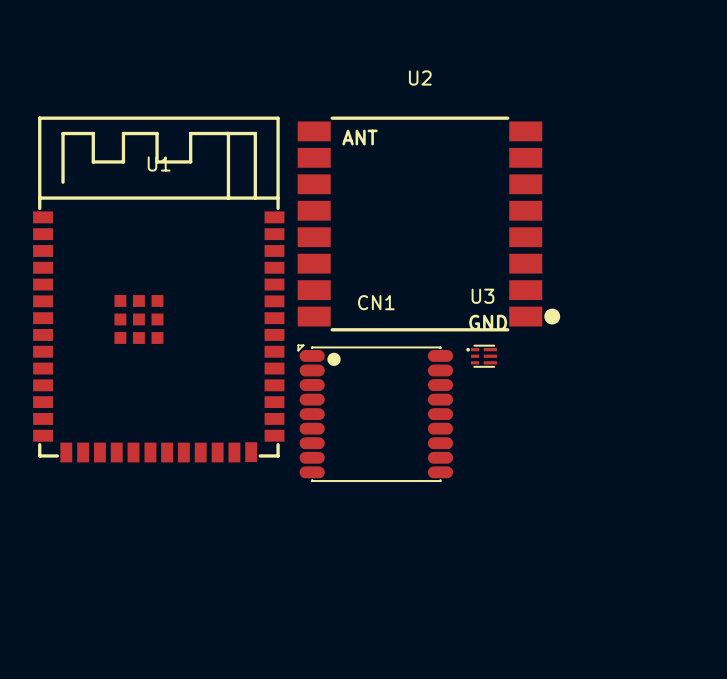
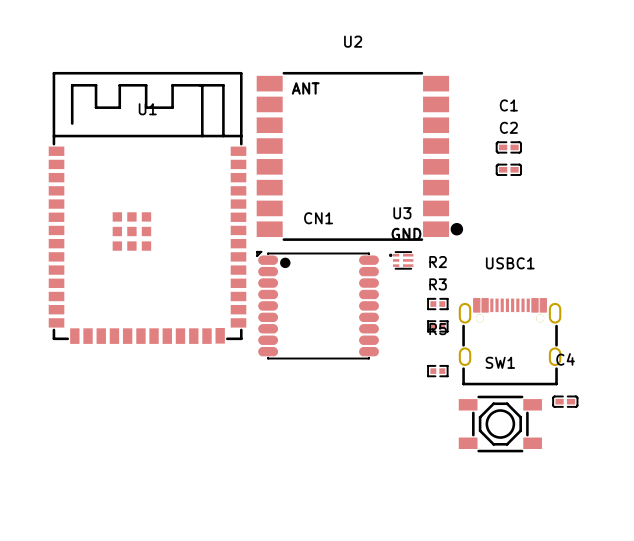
C1: none -> (508, 147)
C2: none -> (508, 169)
R2: none -> (437, 304)
R3: none -> (437, 326)
USBC1: none -> (510, 341)
R5: none -> (437, 371)
C4: none -> (565, 401)
SW1: none -> (500, 424)

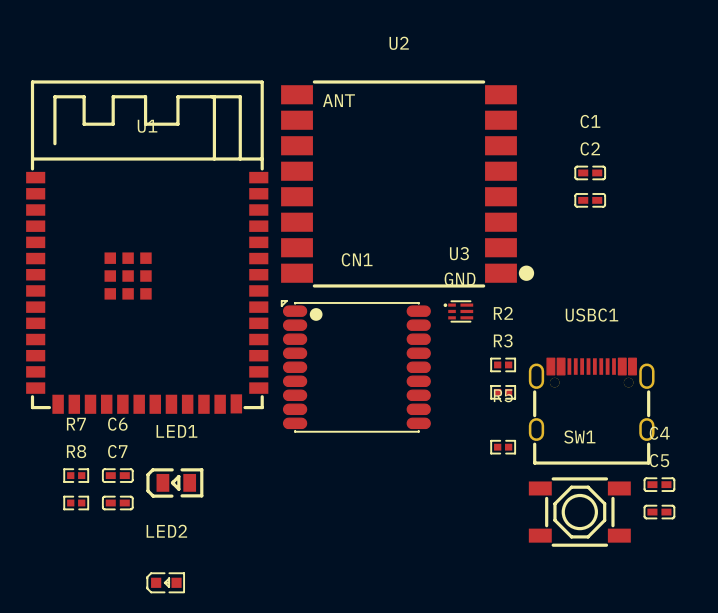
R7: none -> (76, 475)
C6: none -> (117, 475)
LED1: none -> (174, 482)
R8: none -> (76, 503)
C7: none -> (117, 503)
C5: none -> (659, 512)
LED2: none -> (165, 582)

